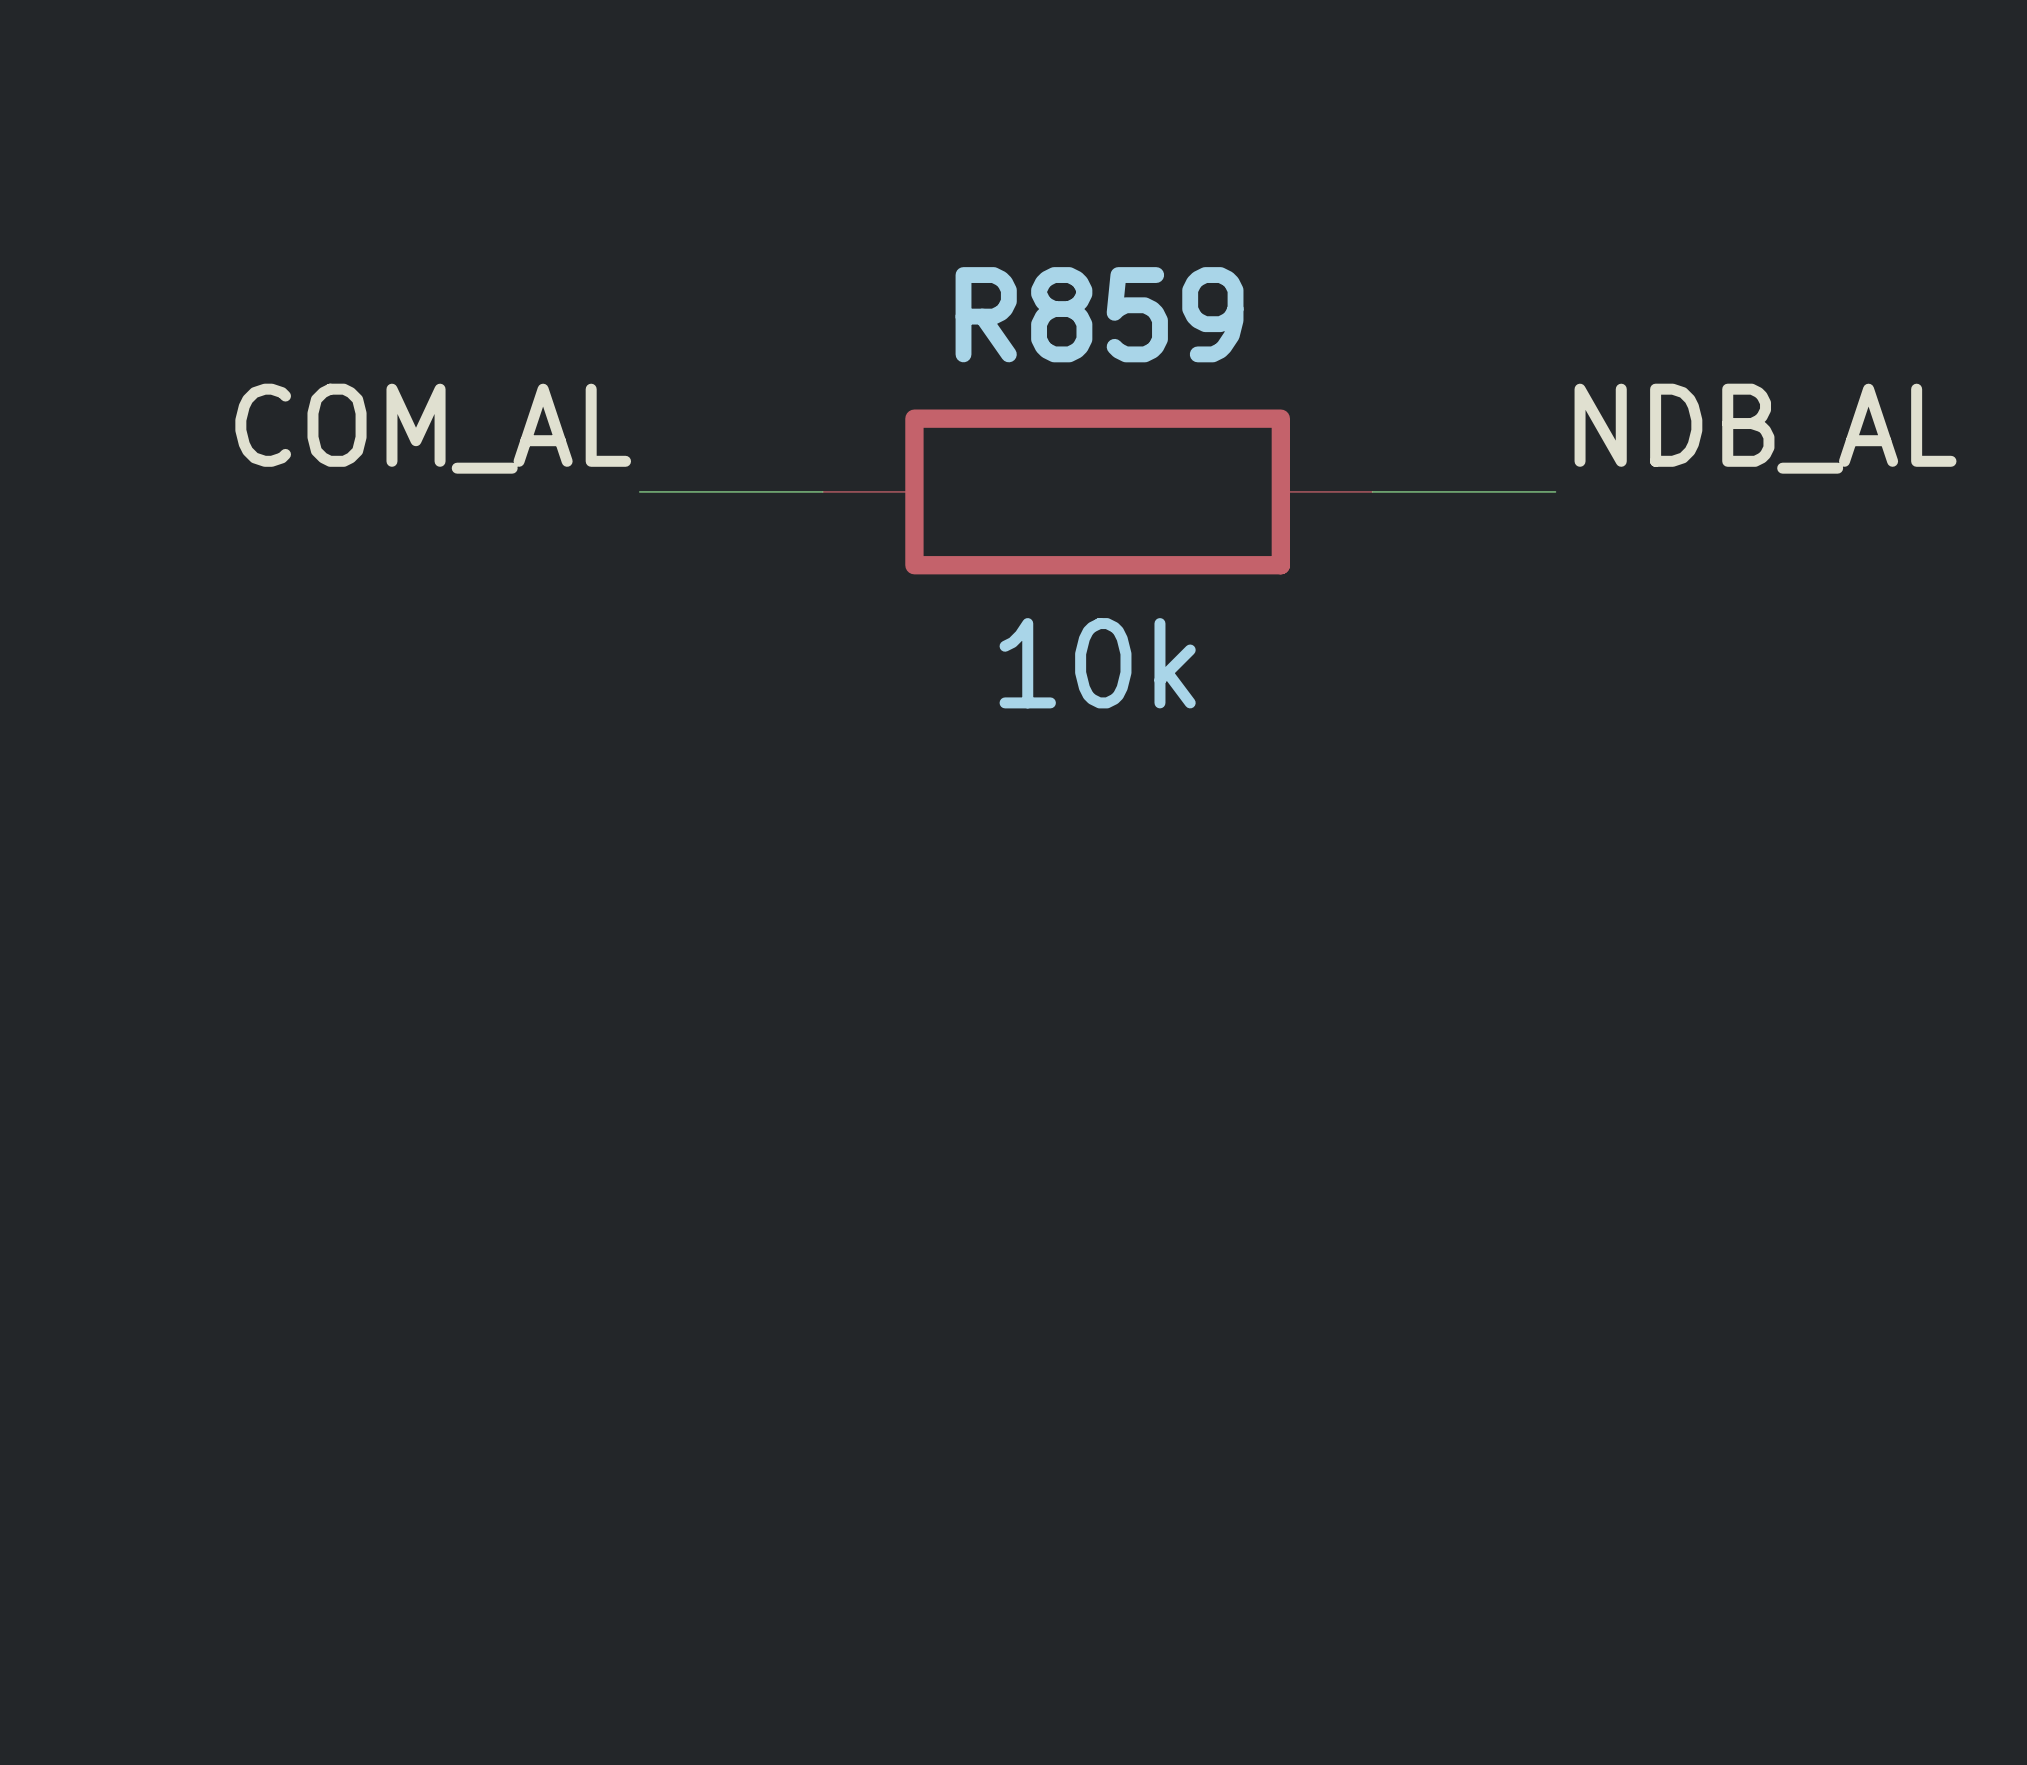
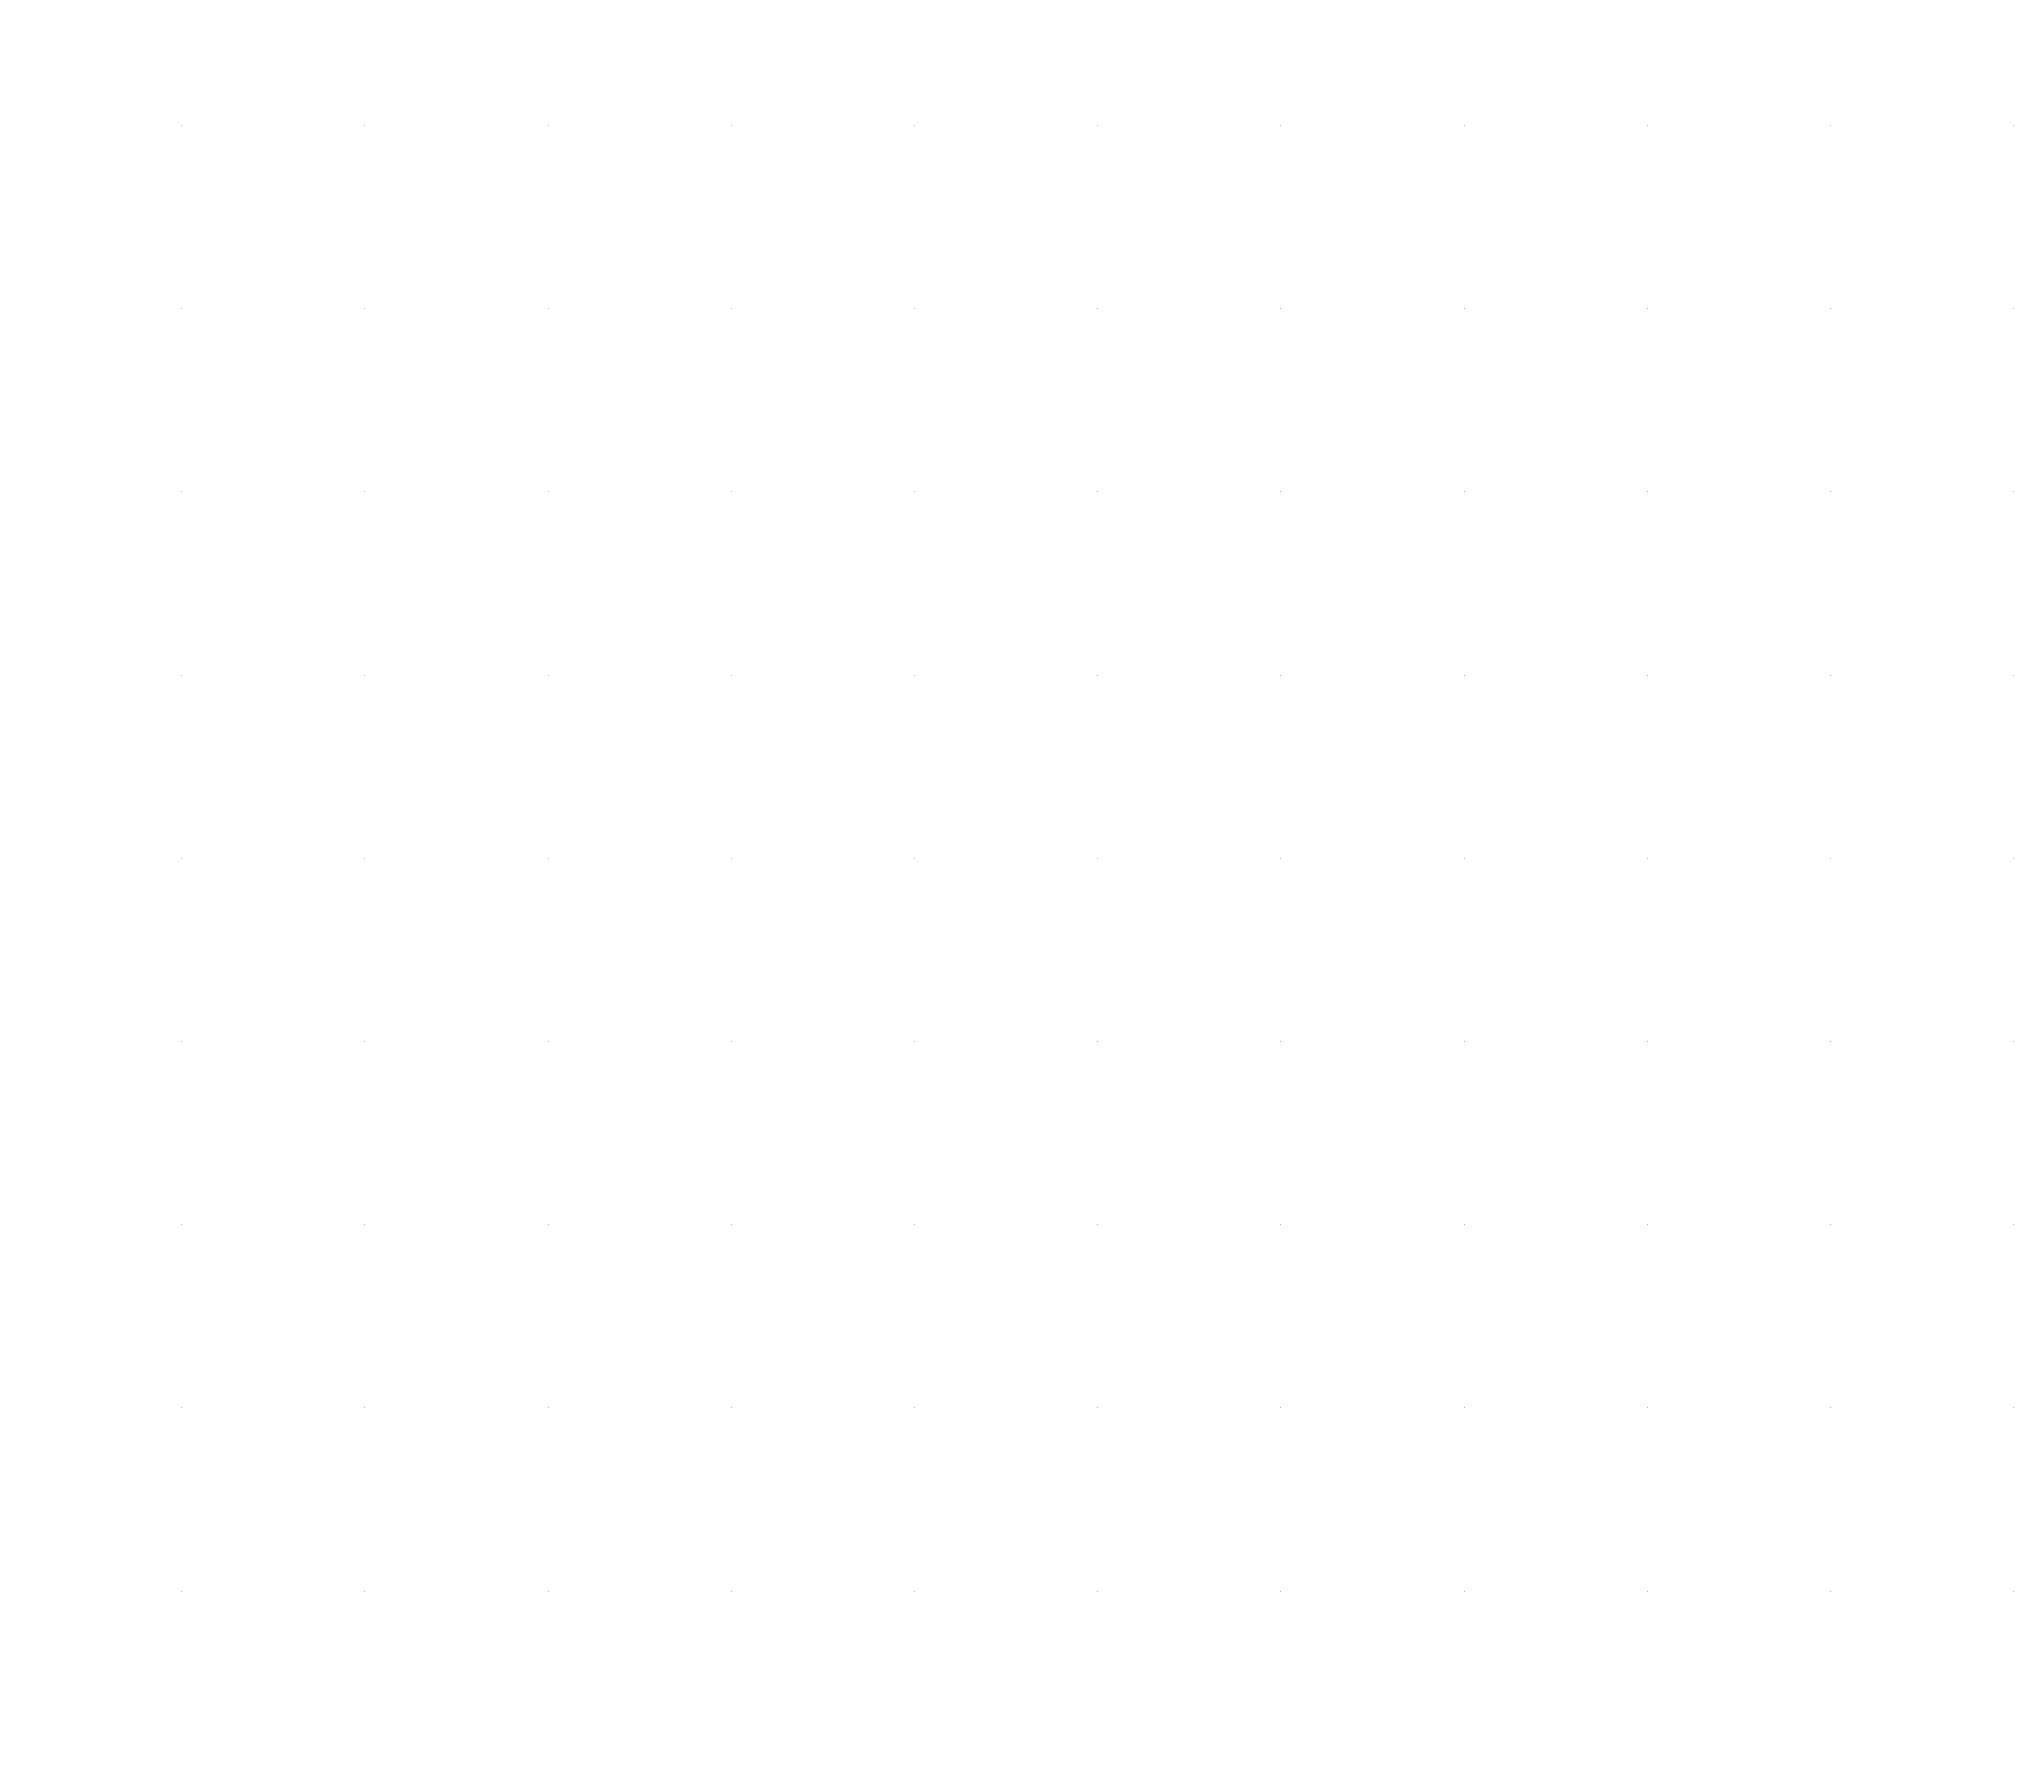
label: COM_AL (433, 428) -> none
label: NDB_AL (1765, 428) -> none
wire: (639, 491) (822, 491) -> none
R859: 10k (1097, 491) -> none
wire: (1372, 491) (1555, 491) -> none

